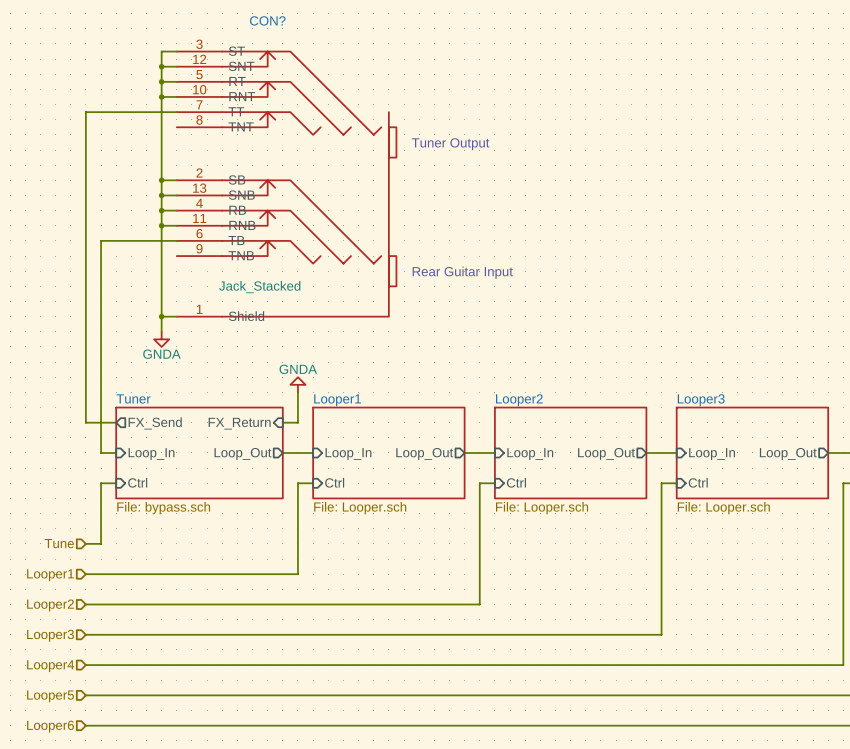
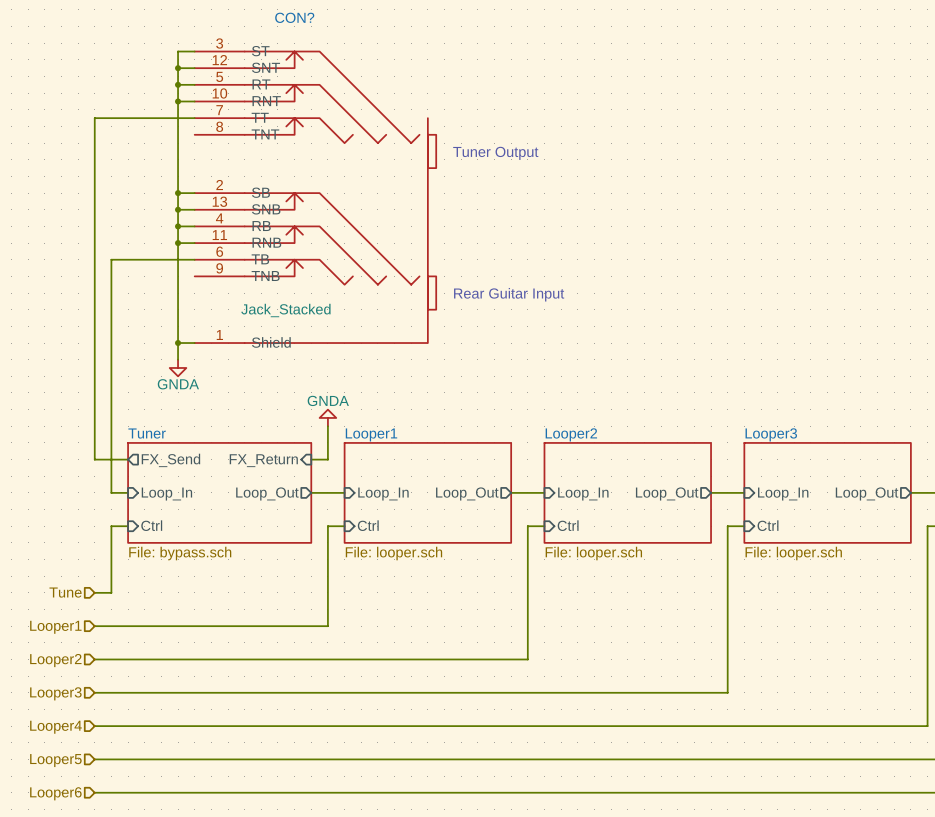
sheet Looper1 value: File: Looper.sch (360, 508) -> File: looper.sch (393, 553)
sheet Looper2 value: File: Looper.sch (542, 508) -> File: looper.sch (593, 553)
sheet Looper3 value: File: Looper.sch (723, 508) -> File: looper.sch (793, 553)

